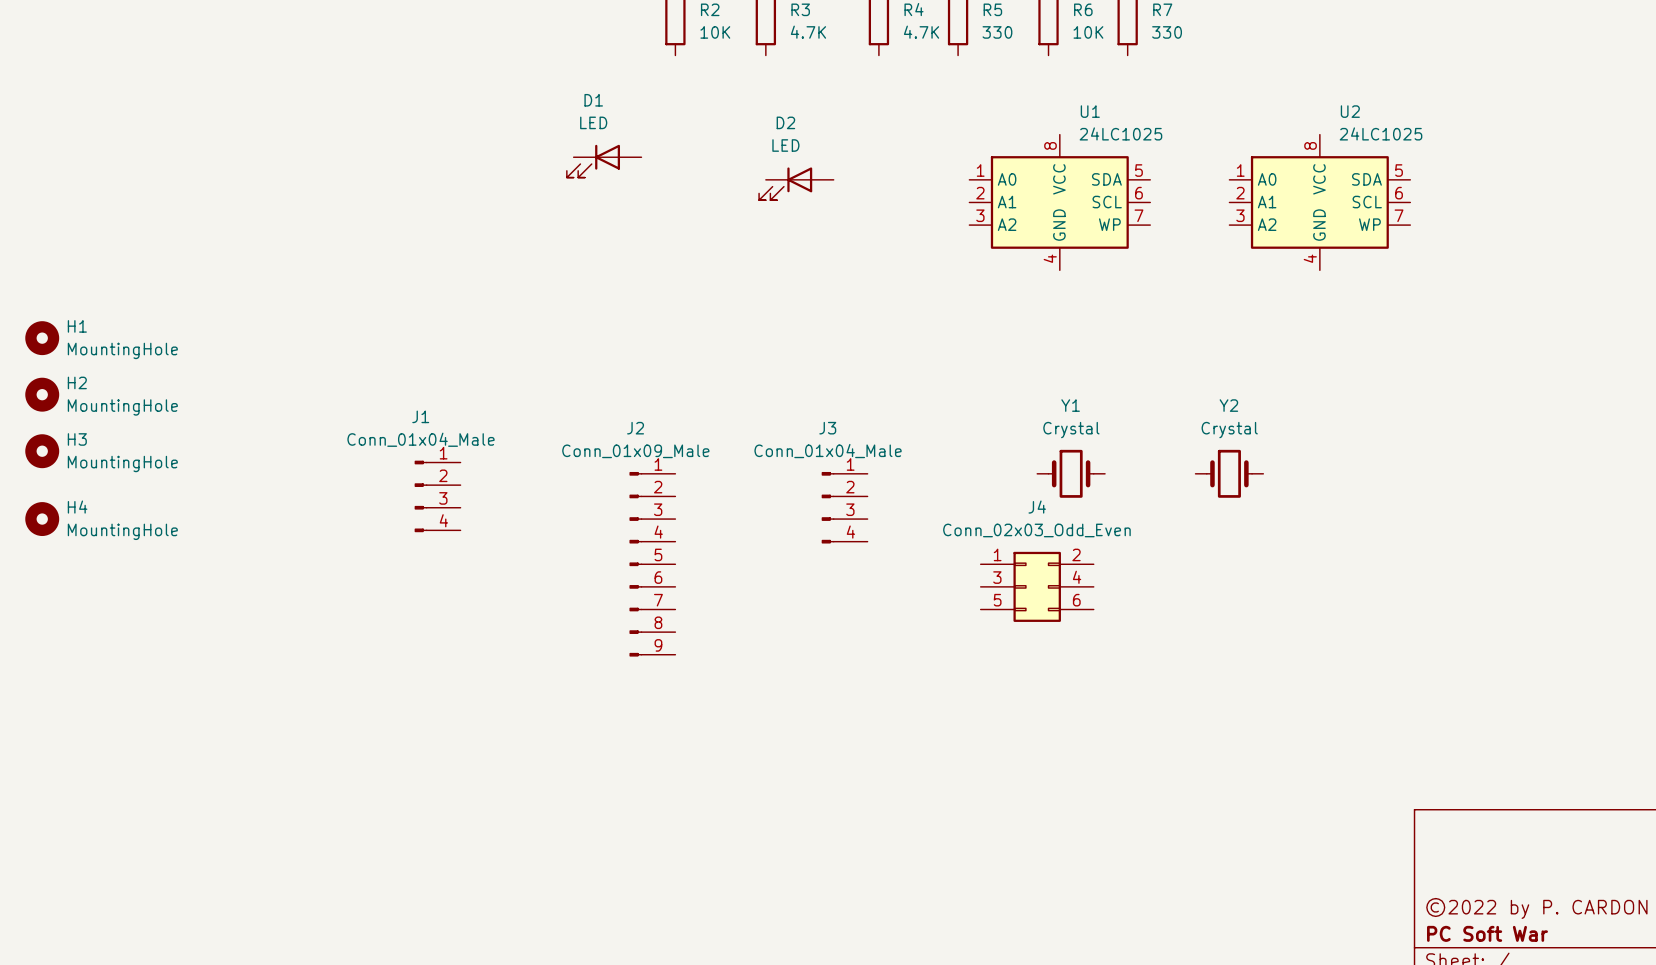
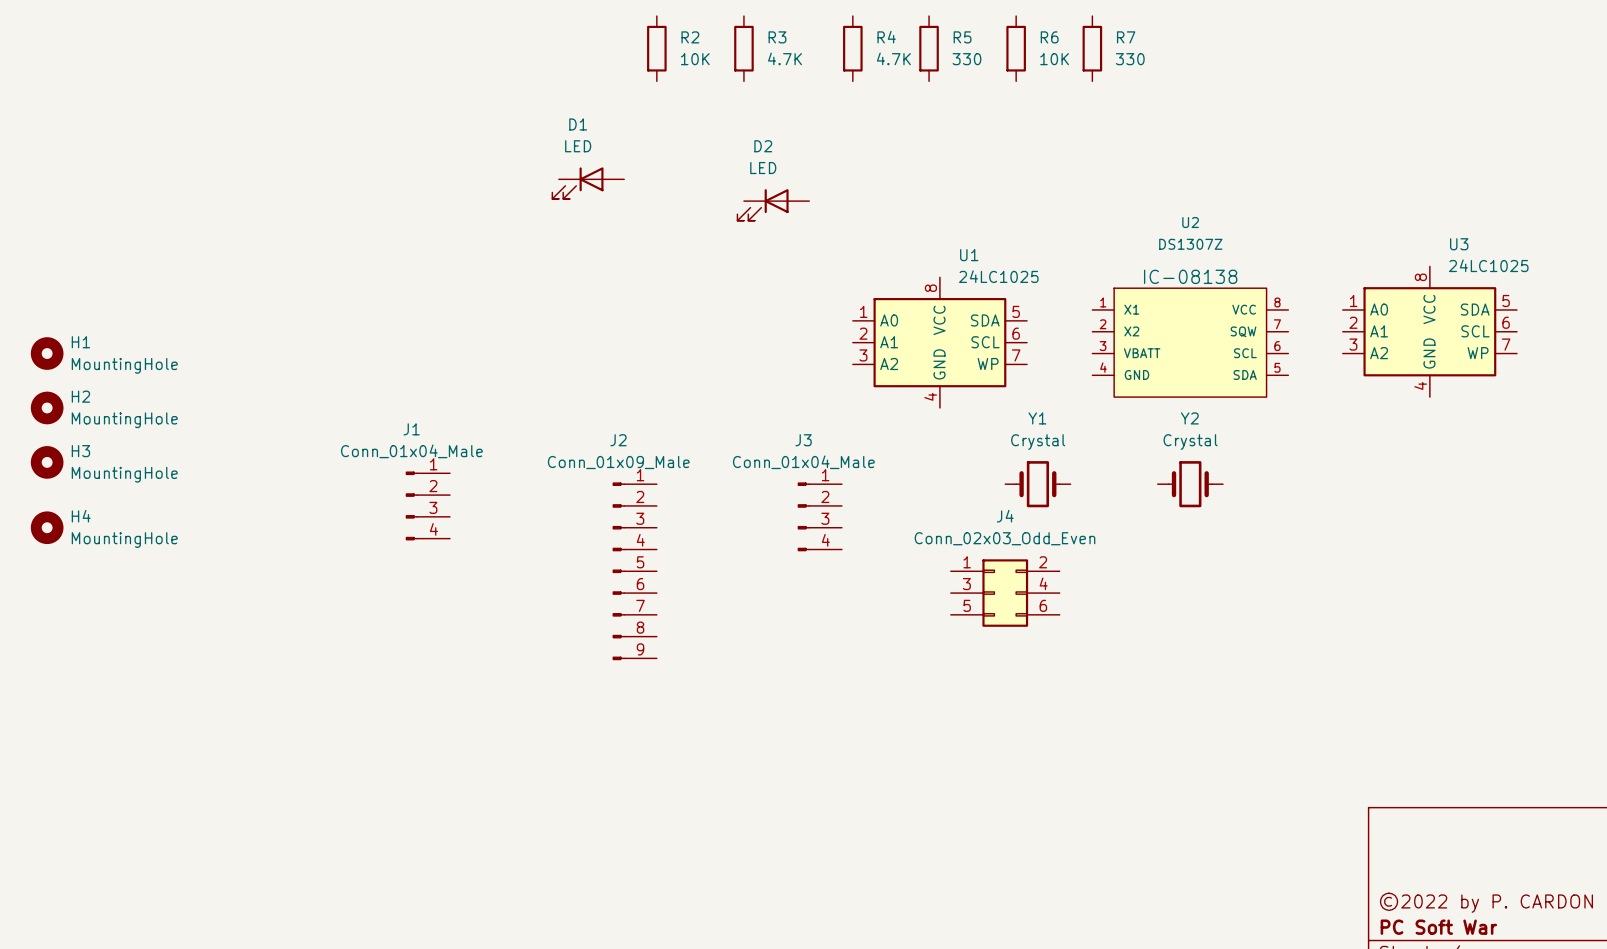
U2 name position: U2 (1350, 111) -> U2 (1190, 222)
U2 value: 24LC1025 (1381, 133) -> DS1307Z (1190, 244)
U2 symbol: [1229, 134, 1411, 271] -> [1092, 288, 1289, 398]
U1 position: (1059, 202) -> (939, 342)
U2 text: none -> IC-08138 (1190, 276)
U3: none -> 24LC1025 (1429, 331)

